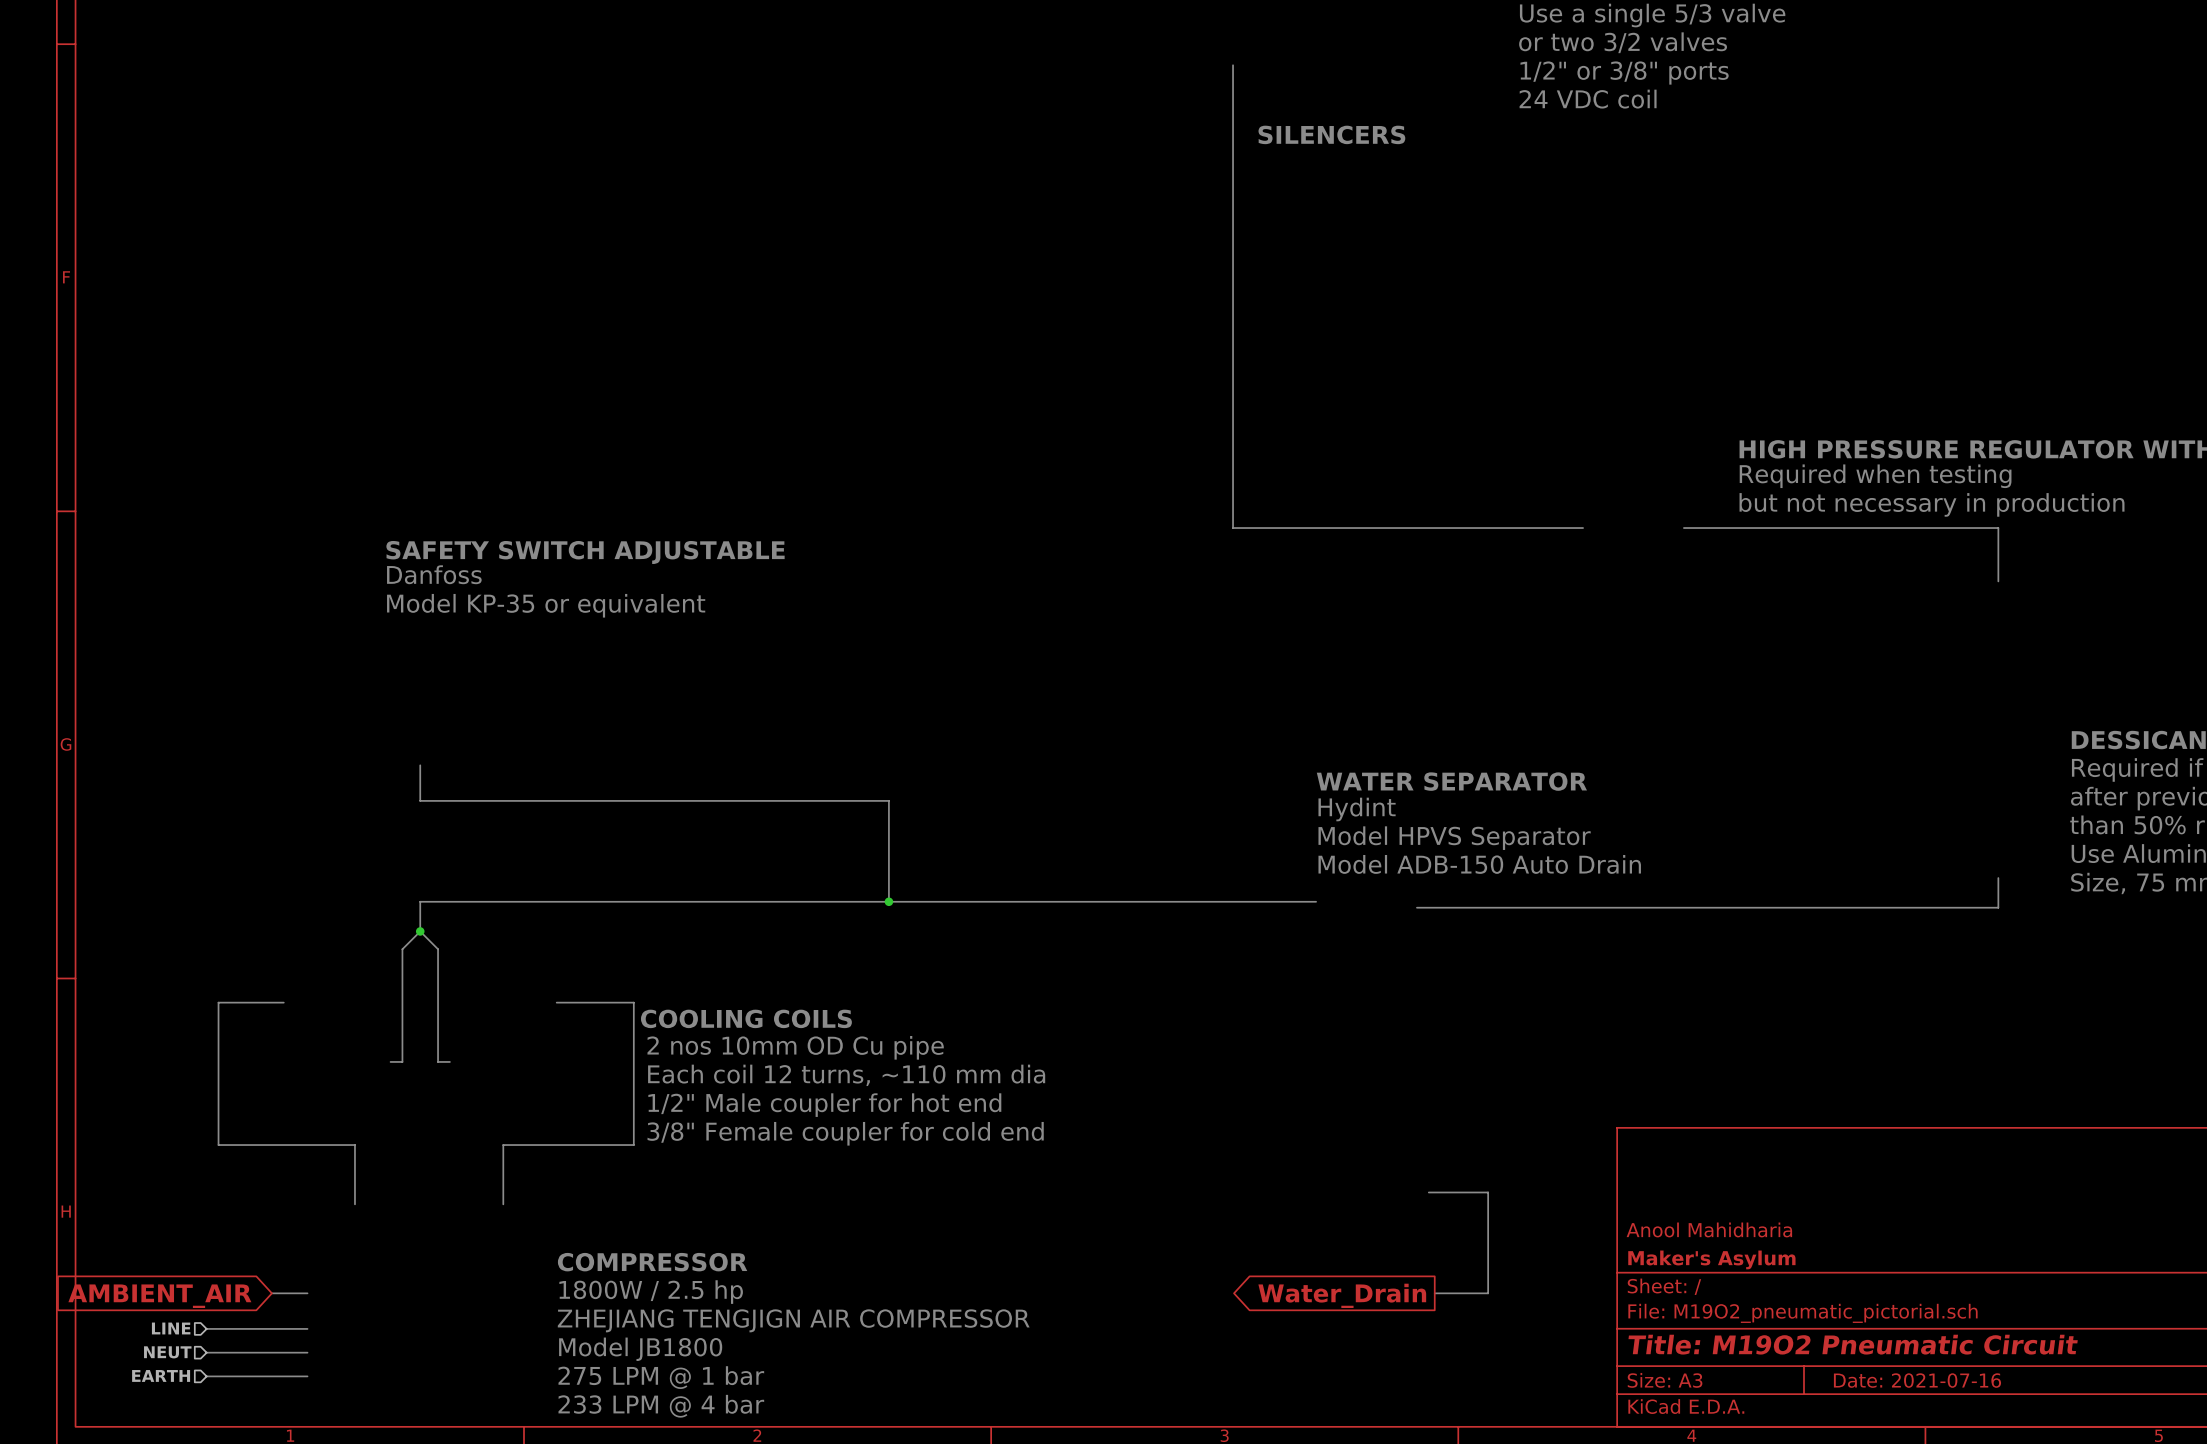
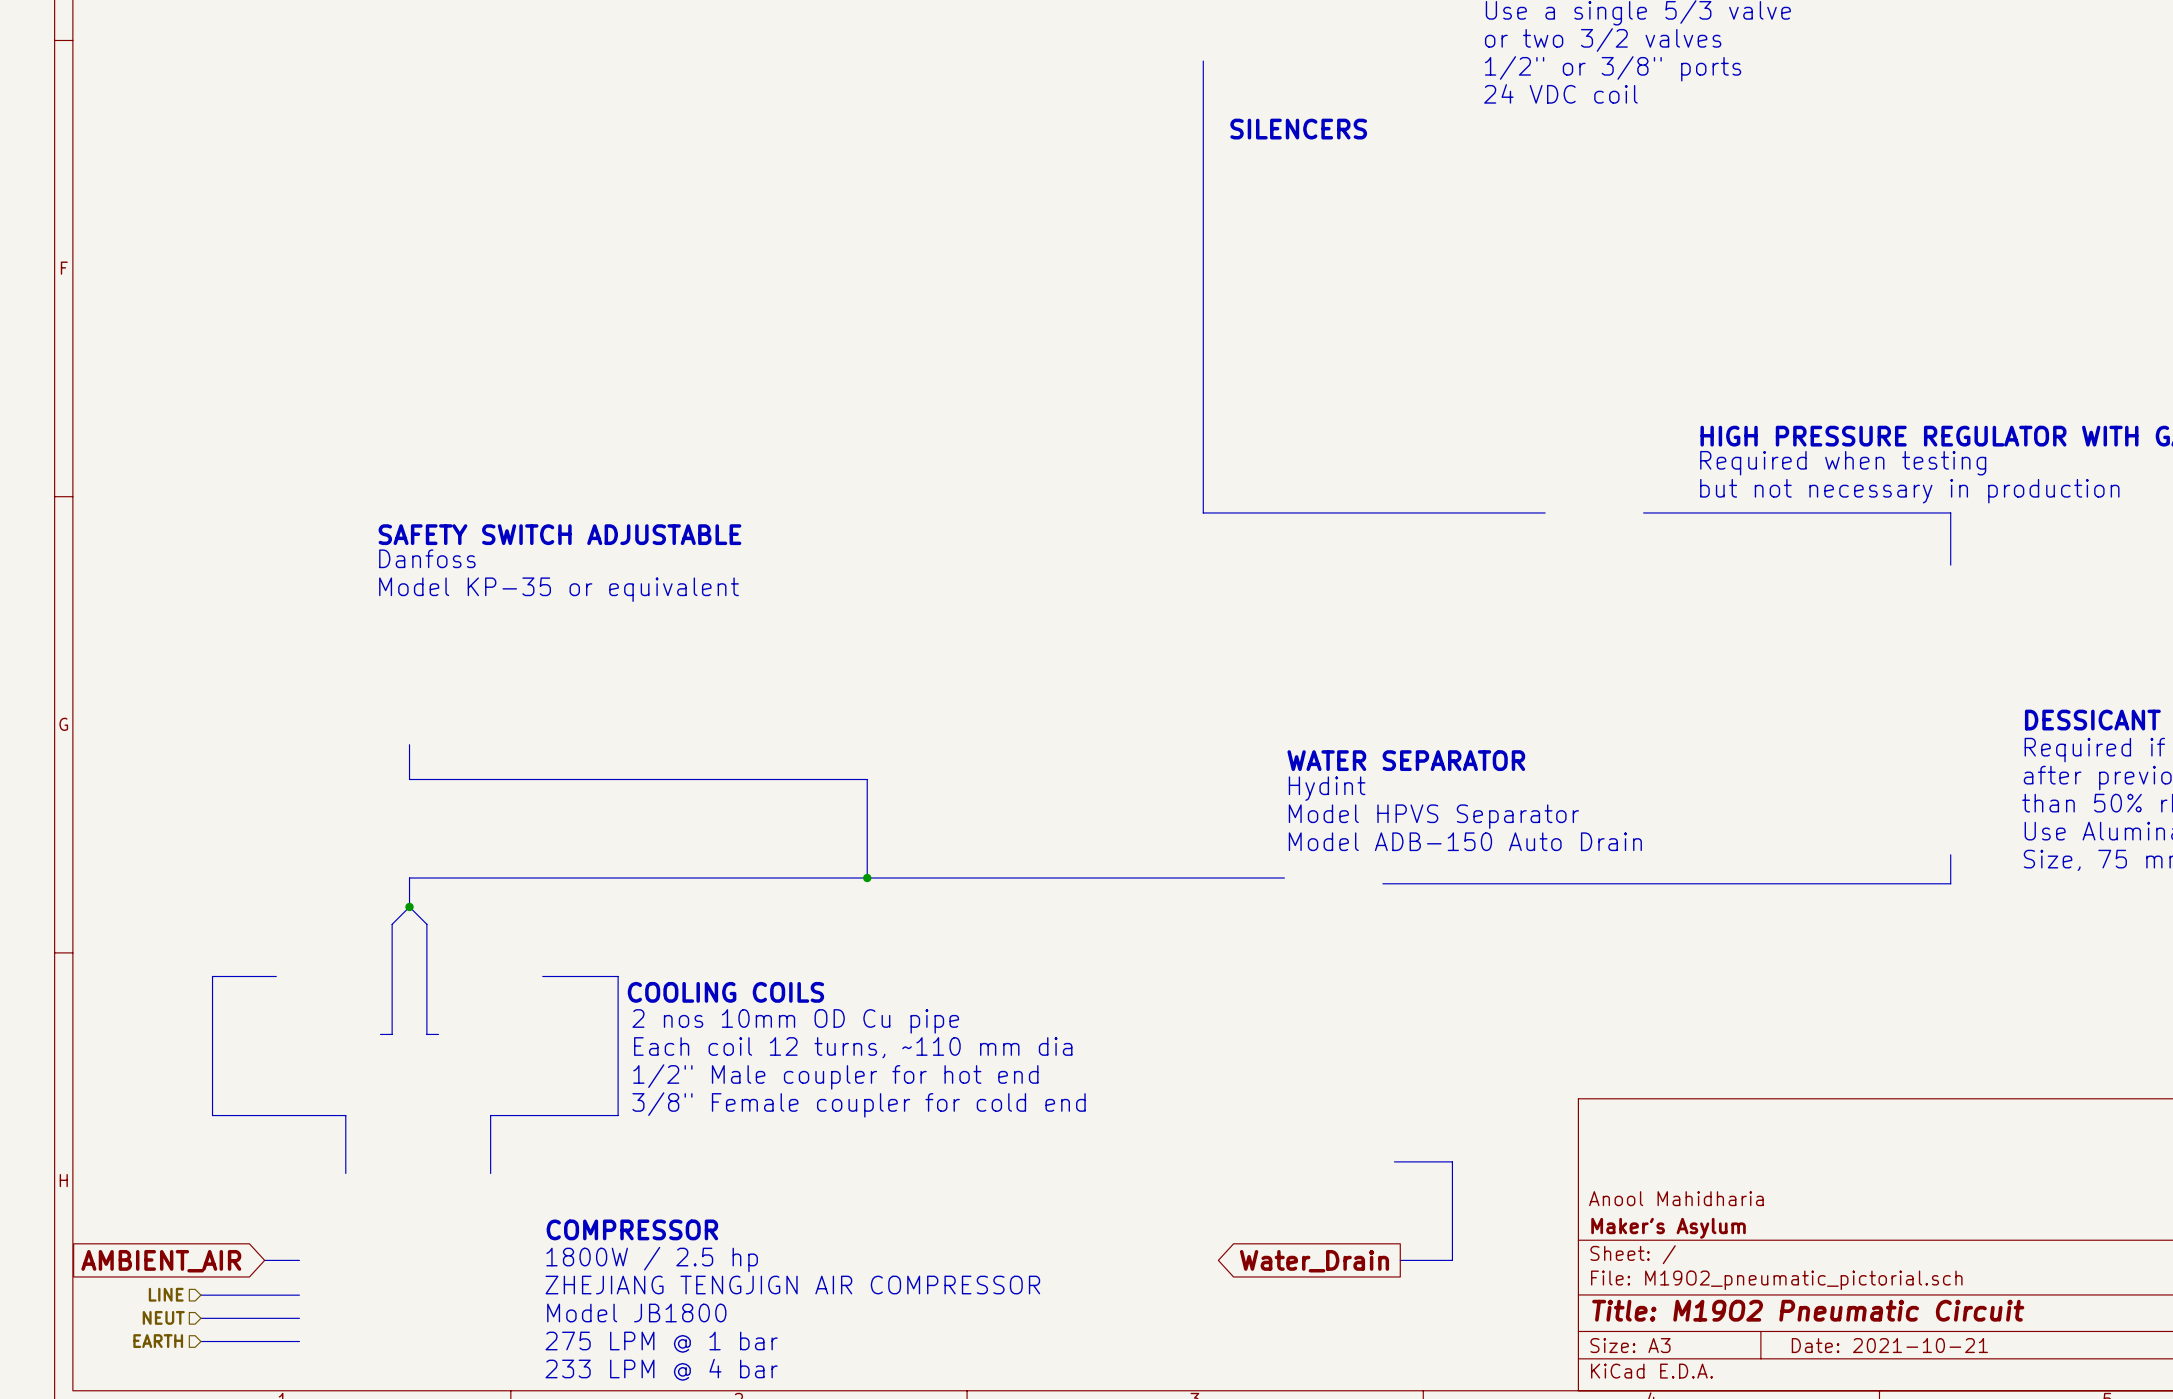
title block: Date: 2021-07-16 (1917, 1380) -> Date: 2021-10-21 (1889, 1345)

